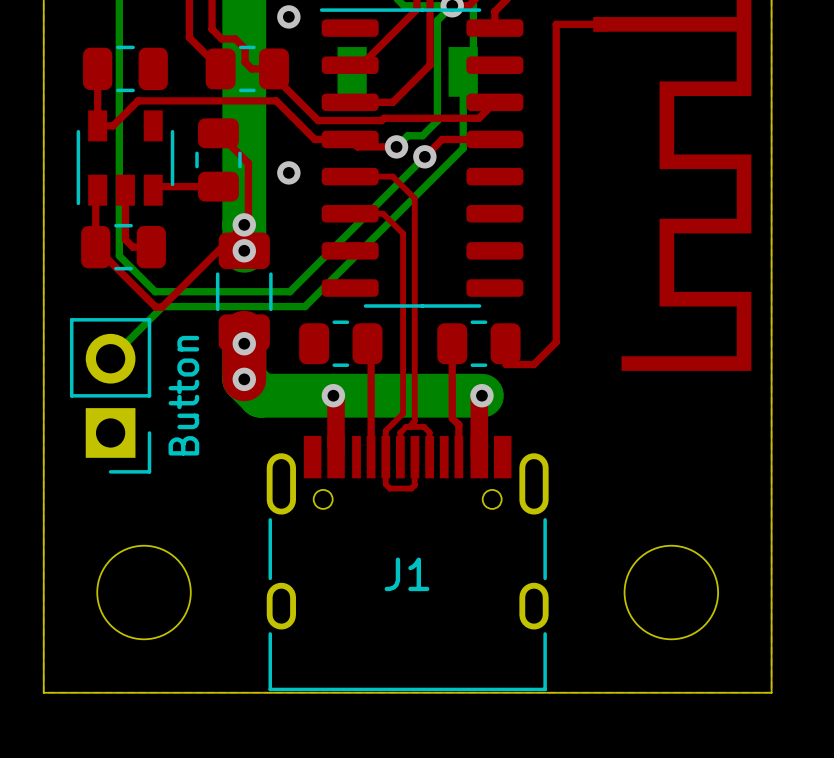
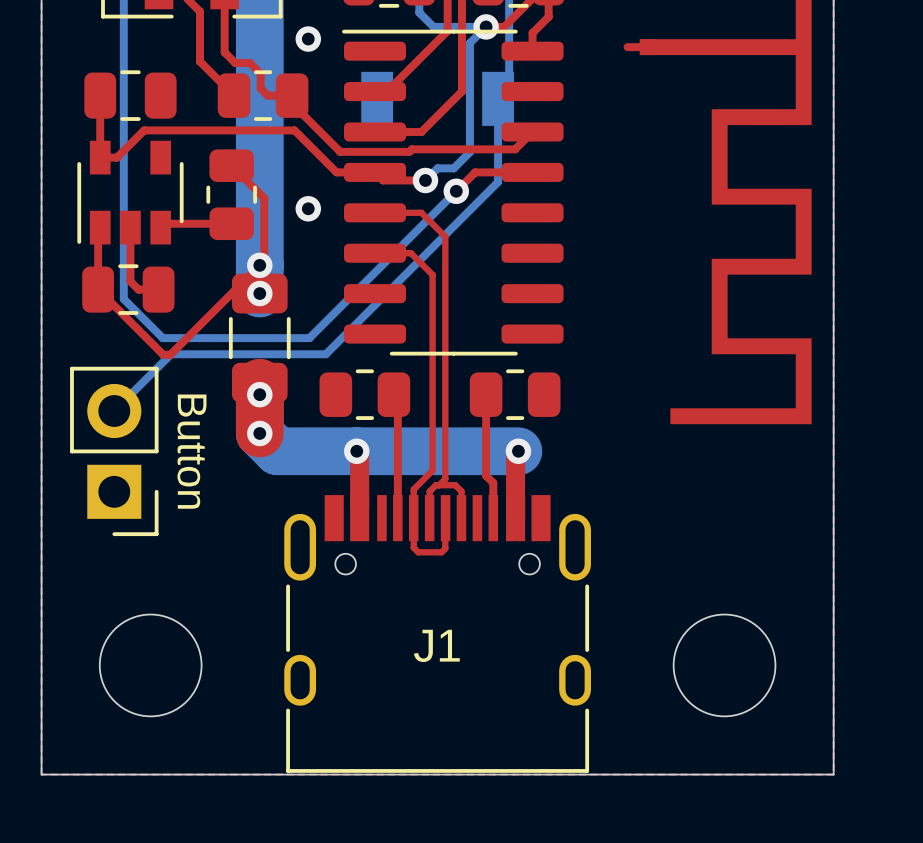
top track: (582, 24) (556, 24) (556, 342) (533, 364) (505, 364) -> none
text rotation: 0° (183, 395) -> 180° (191, 451)

